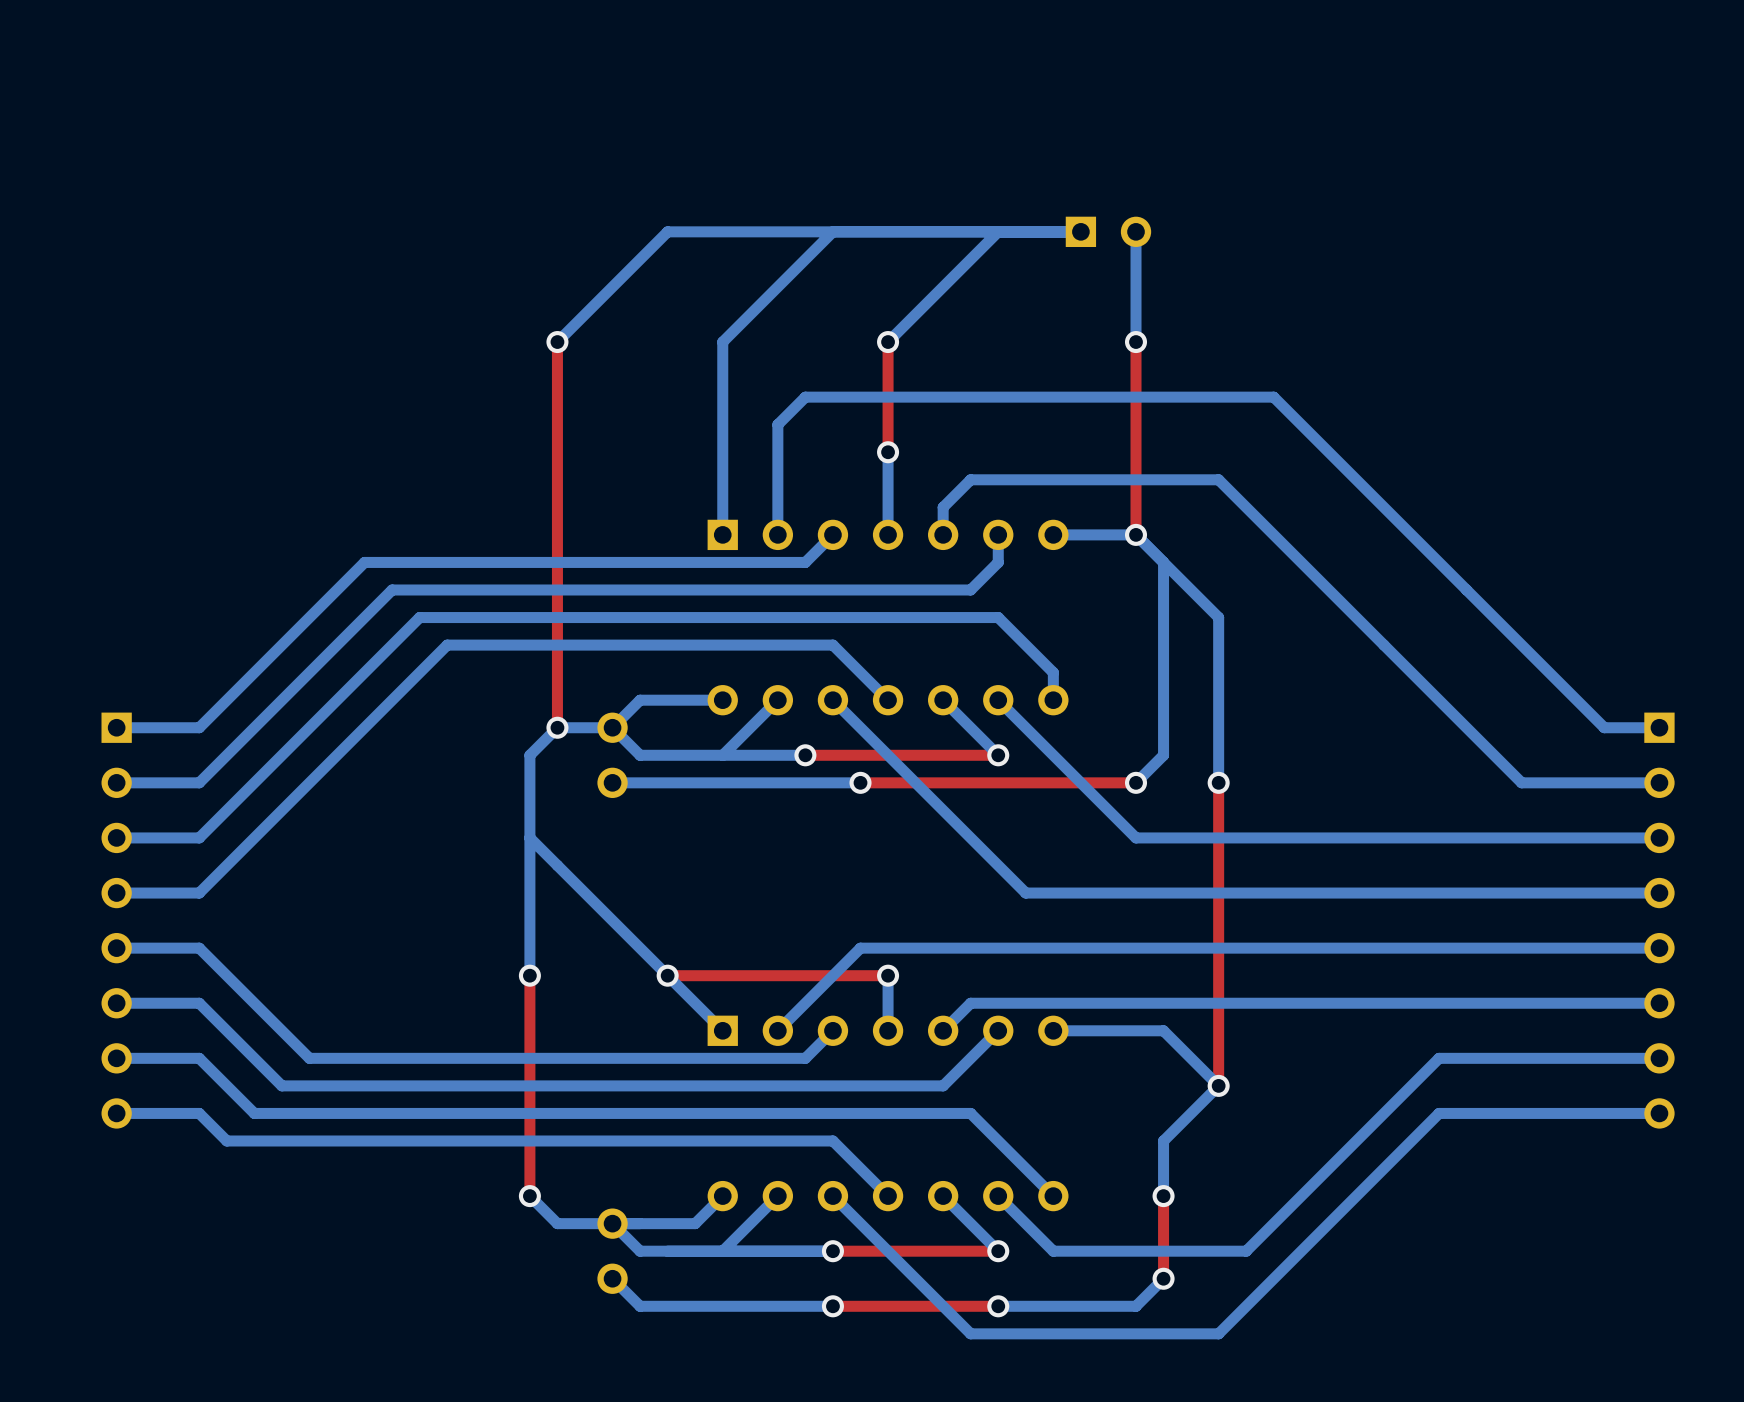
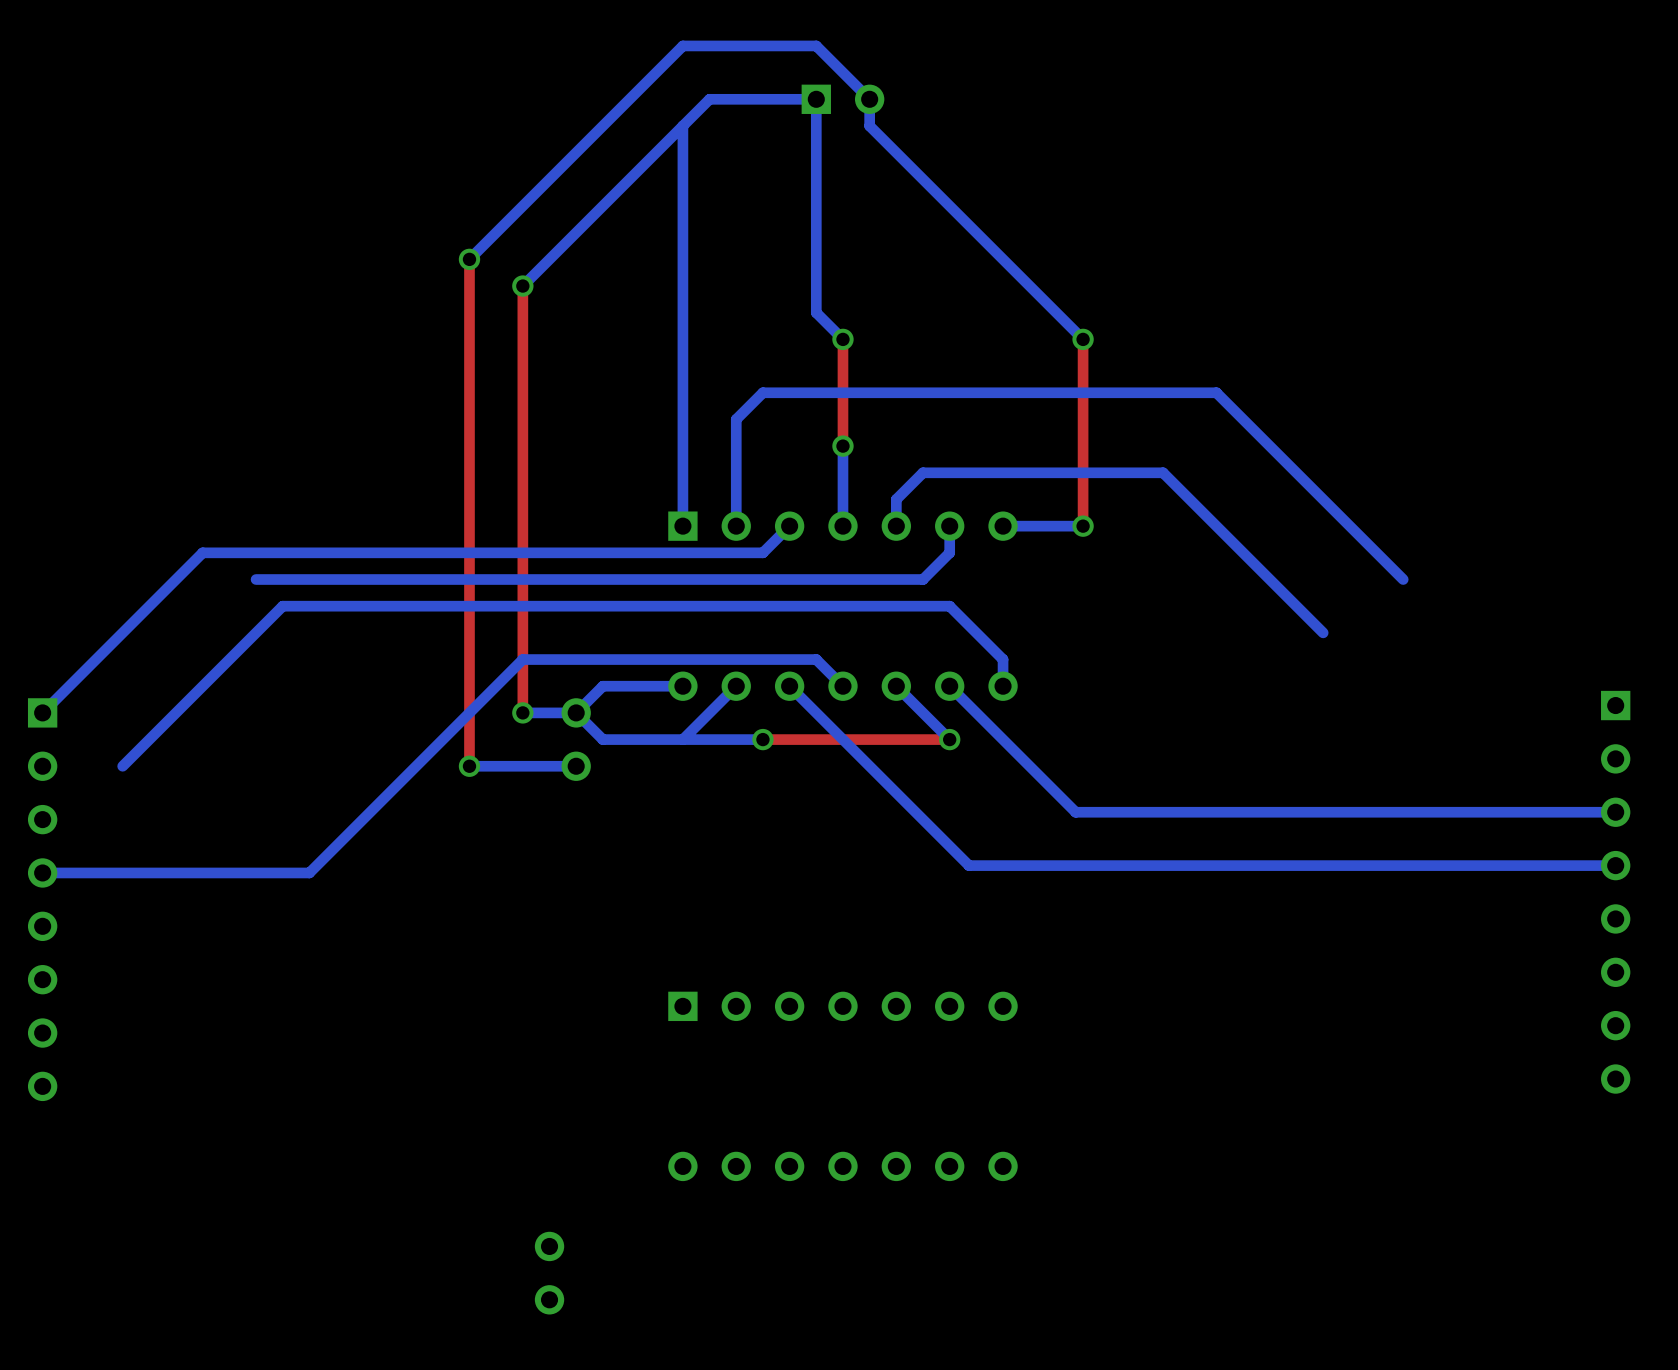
bottom track: (832, 231) (722, 342) -> (682, 125) (682, 339)
bottom track: (998, 231) (888, 342) -> (522, 286) (709, 99) (816, 99) (816, 312) (842, 339)
bottom track: (1080, 231) (667, 231) (557, 342) -> none
part position: (1108, 231) -> (842, 99)
bottom track: (1136, 231) (1136, 342) -> (469, 259) (682, 45) (816, 45) (869, 99) (869, 125) (1083, 339)
top track: none -> (469, 259) (469, 766)
via: none -> (469, 259)
top track: none -> (522, 286) (522, 339)
via: none -> (522, 286)
via: (557, 342) -> none
bottom track: (1136, 534) (1218, 617) (1218, 782) -> none
bottom track: (364, 562) (309, 617) -> (389, 606) (282, 606)
bottom track: none -> (336, 552) (202, 552) (42, 712)
bottom track: (1163, 562) (1163, 755) (1136, 782) -> none
bottom track: (392, 589) (199, 782) (116, 782) -> (362, 579) (256, 579)
bottom track: (1466, 589) (1604, 727) (1659, 727) -> none
bottom track: (419, 617) (199, 837) (116, 837) -> none
bottom track: (1383, 645) (1521, 782) (1659, 782) -> none
bottom track: (860, 672) (832, 645) (447, 645) (199, 893) -> (816, 659) (522, 659) (309, 872) (176, 872)
bottom track: (199, 727) (116, 727) -> (176, 712) (122, 766)
bottom track: (557, 727) (529, 755) (529, 975) -> none
via: none -> (469, 766)
bottom track: (860, 782) (612, 782) -> (469, 766) (576, 766)
via: (860, 782) -> none
top track: (1136, 782) (860, 782) -> none
via: (1136, 782) -> none
top track: (1218, 782) (1218, 1085) -> none
via: (1218, 782) -> none
bottom track: (1128, 830) (1136, 837) (1659, 837) -> (1075, 812) (1615, 812)
bottom track: (529, 837) (722, 1030) -> none
bottom track: (1018, 885) (1025, 893) (1659, 893) -> (969, 865) (1615, 865)
bottom track: none -> (95, 872) (42, 872)
part position: (116, 920) -> (42, 899)
part position: (1659, 920) -> (1615, 892)
bottom track: (116, 948) (199, 948) (309, 1058) (805, 1058) (832, 1030) -> none
bottom track: (1659, 948) (860, 948) (777, 1030) -> none
top track: (529, 975) (529, 1196) -> none
via: (529, 975) -> none
via: (667, 975) -> none
bottom track: (888, 975) (888, 1030) -> none
top track: (888, 975) (667, 975) -> none
via: (888, 975) -> none
bottom track: (116, 1003) (199, 1003) (281, 1085) (943, 1085) (998, 1030) -> none
bottom track: (1659, 1003) (970, 1003) (943, 1030) -> none
bottom track: (1053, 1030) (1163, 1030) (1218, 1085) (1163, 1140) (1163, 1196) -> none
bottom track: (116, 1058) (199, 1058) (254, 1113) (970, 1113) (1053, 1196) -> none
bottom track: (1659, 1058) (1439, 1058) (1246, 1251) (1053, 1251) (998, 1196) -> none
via: (1218, 1085) -> none
bottom track: (116, 1113) (199, 1113) (226, 1140) (832, 1140) (888, 1196) -> none
bottom track: (1659, 1113) (1439, 1113) (1218, 1333) (970, 1333) (832, 1196) -> none
via: (529, 1196) -> none
bottom track: (722, 1196) (695, 1223) (557, 1223) (529, 1196) -> none
bottom track: (777, 1196) (722, 1251) -> none
bottom track: (943, 1196) (998, 1251) -> none
top track: (1163, 1196) (1163, 1278) -> none
via: (1163, 1196) -> none
bottom track: (612, 1223) (640, 1251) (832, 1251) -> none
part position: (612, 1251) -> (549, 1273)
via: (832, 1251) -> none
top track: (998, 1251) (832, 1251) -> none
via: (998, 1251) -> none
bottom track: (612, 1278) (640, 1306) (832, 1306) -> none
bottom track: (1163, 1278) (1136, 1306) (998, 1306) -> none
via: (1163, 1278) -> none
via: (832, 1306) -> none
top track: (998, 1306) (832, 1306) -> none
via: (998, 1306) -> none

